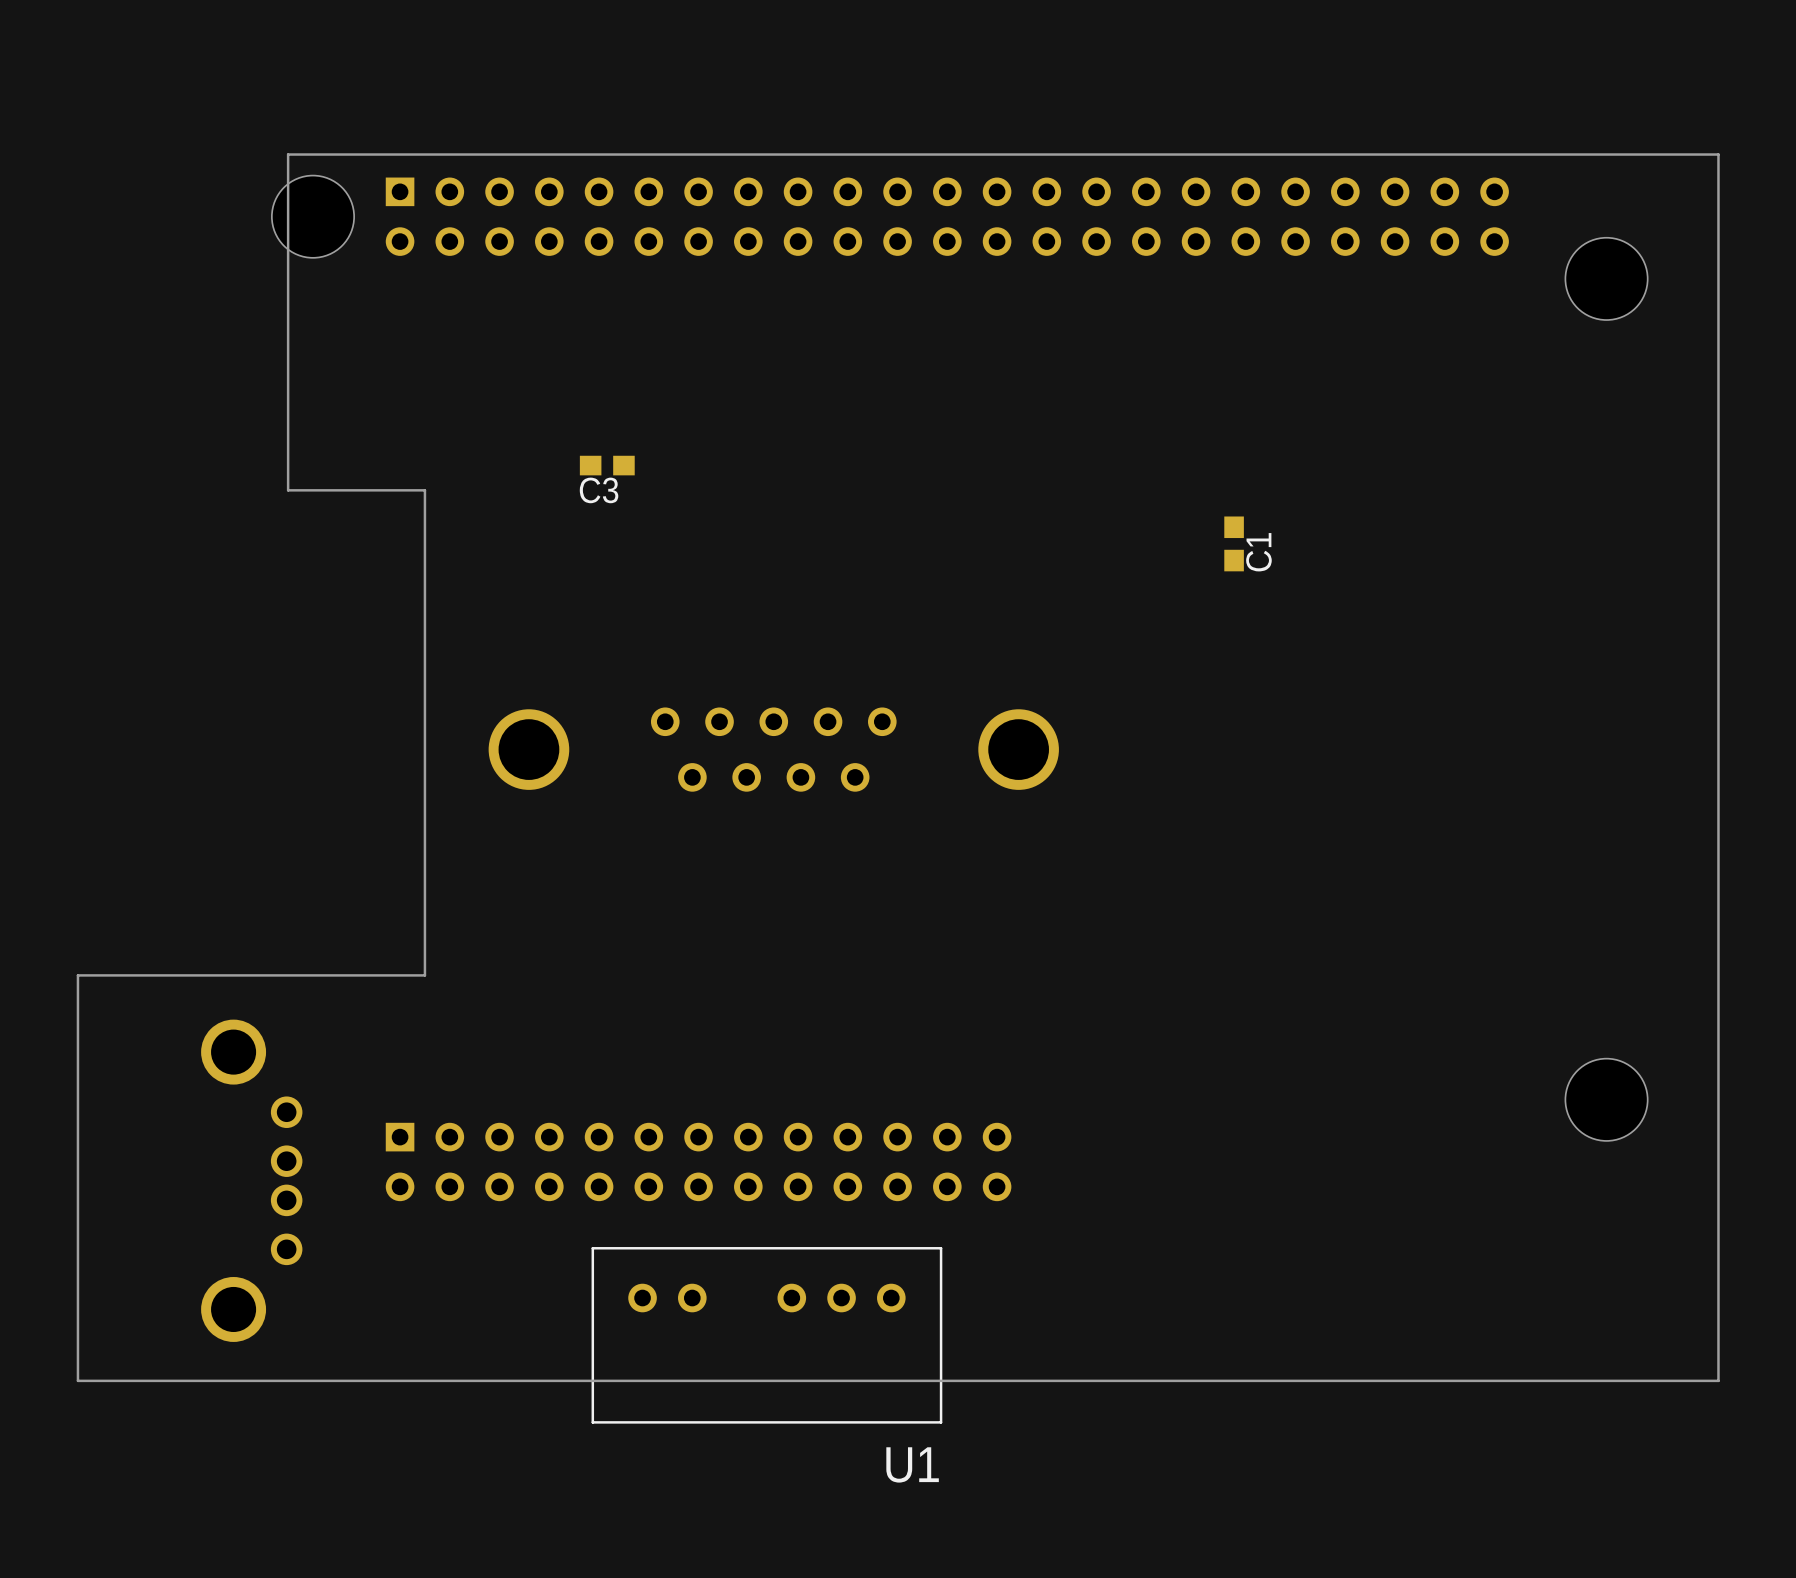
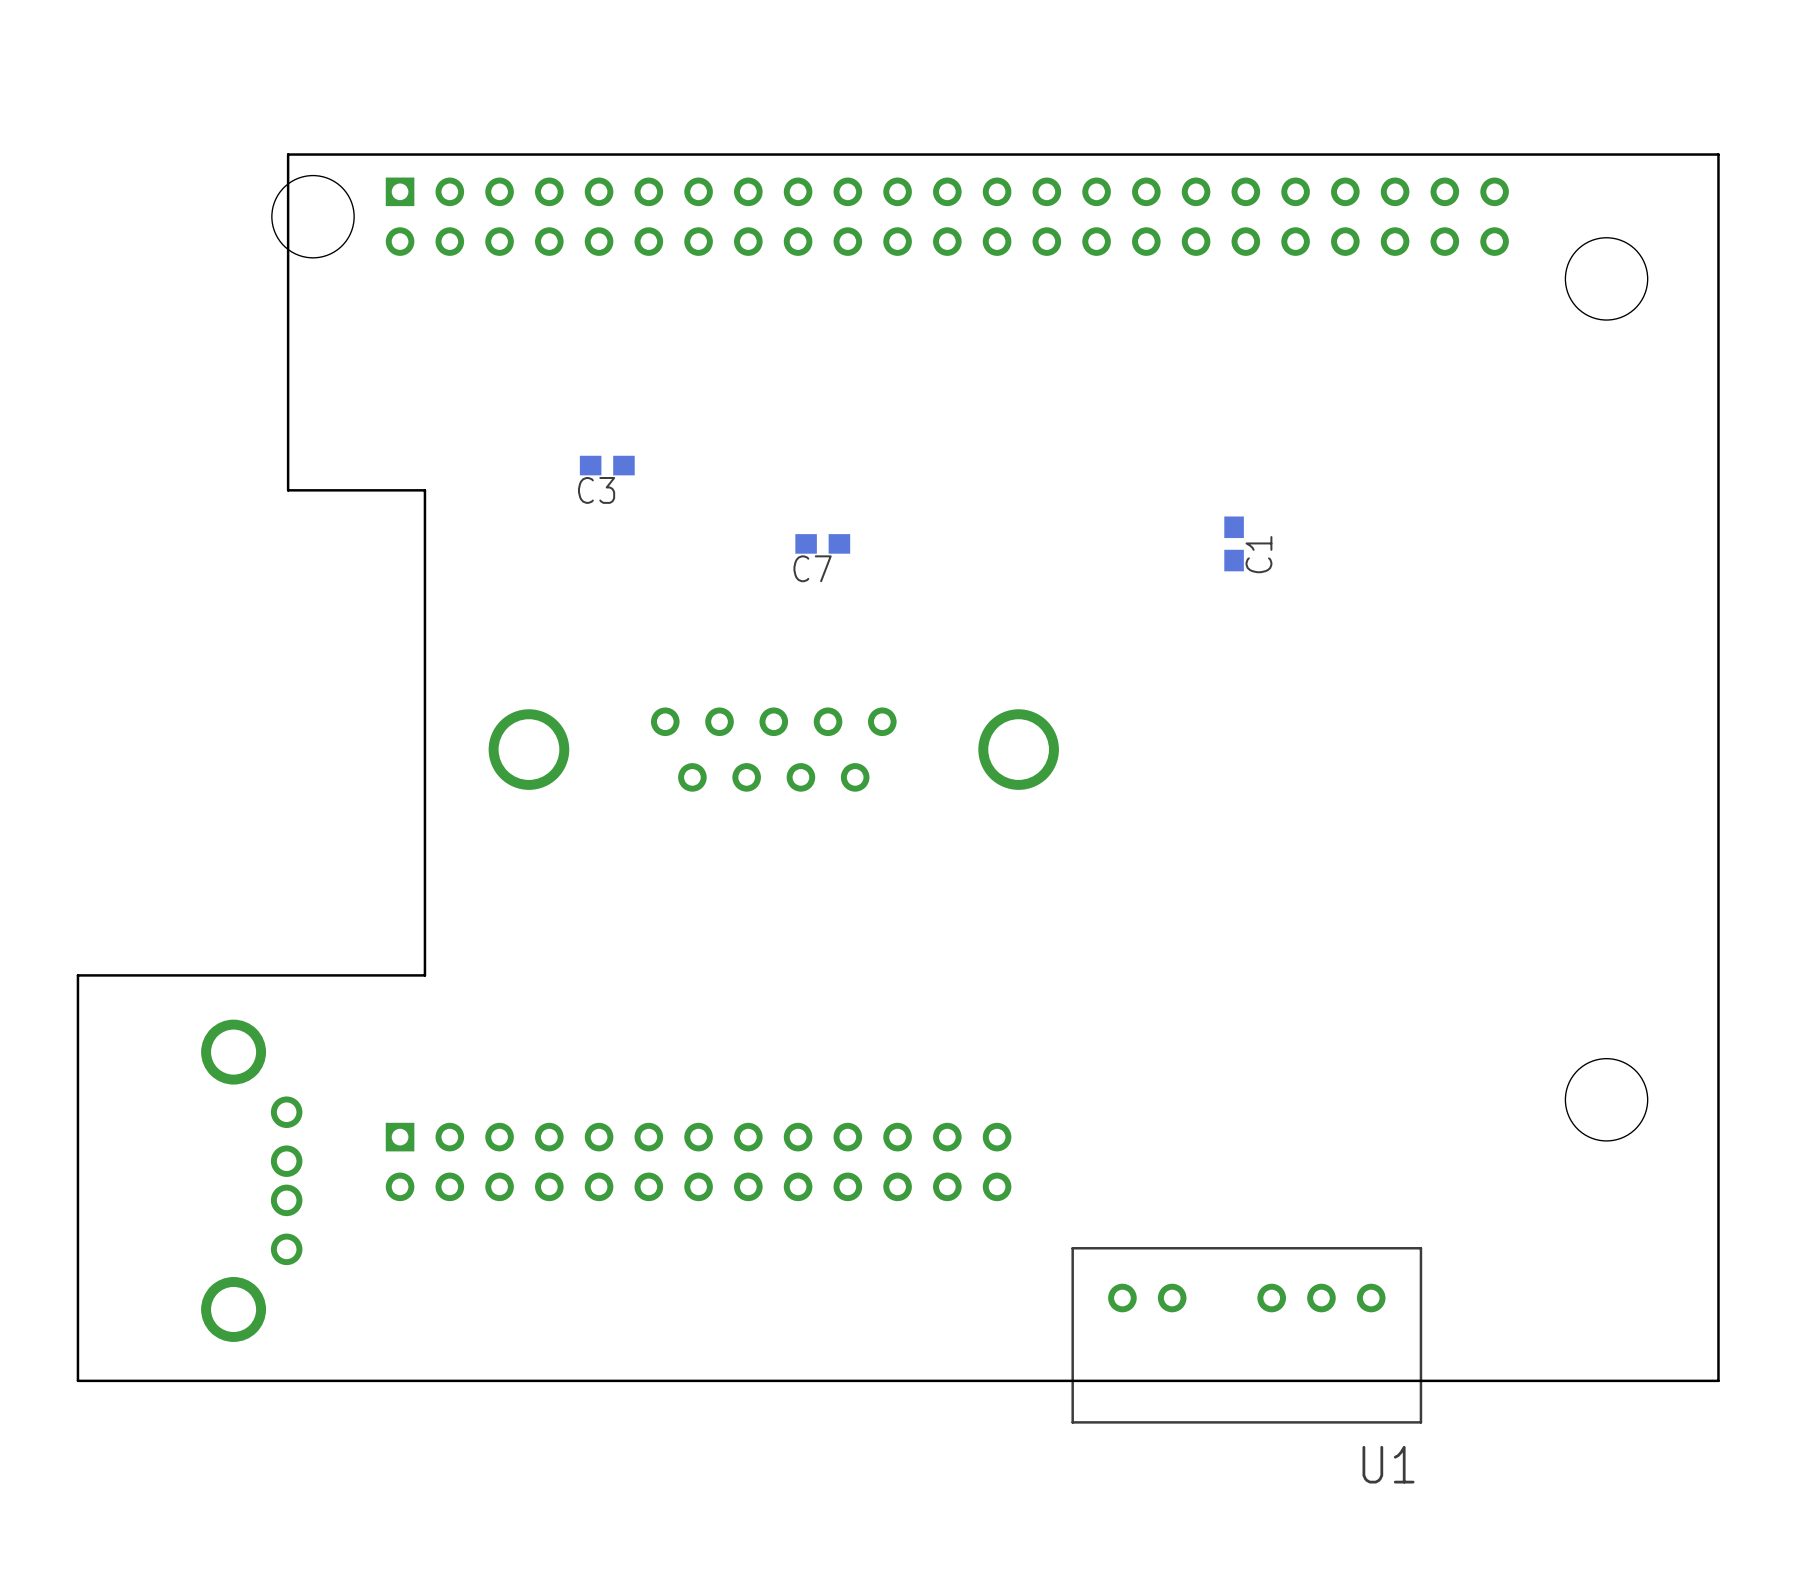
C7: none -> (822, 543)
U1 position: (766, 1335) -> (1246, 1335)

